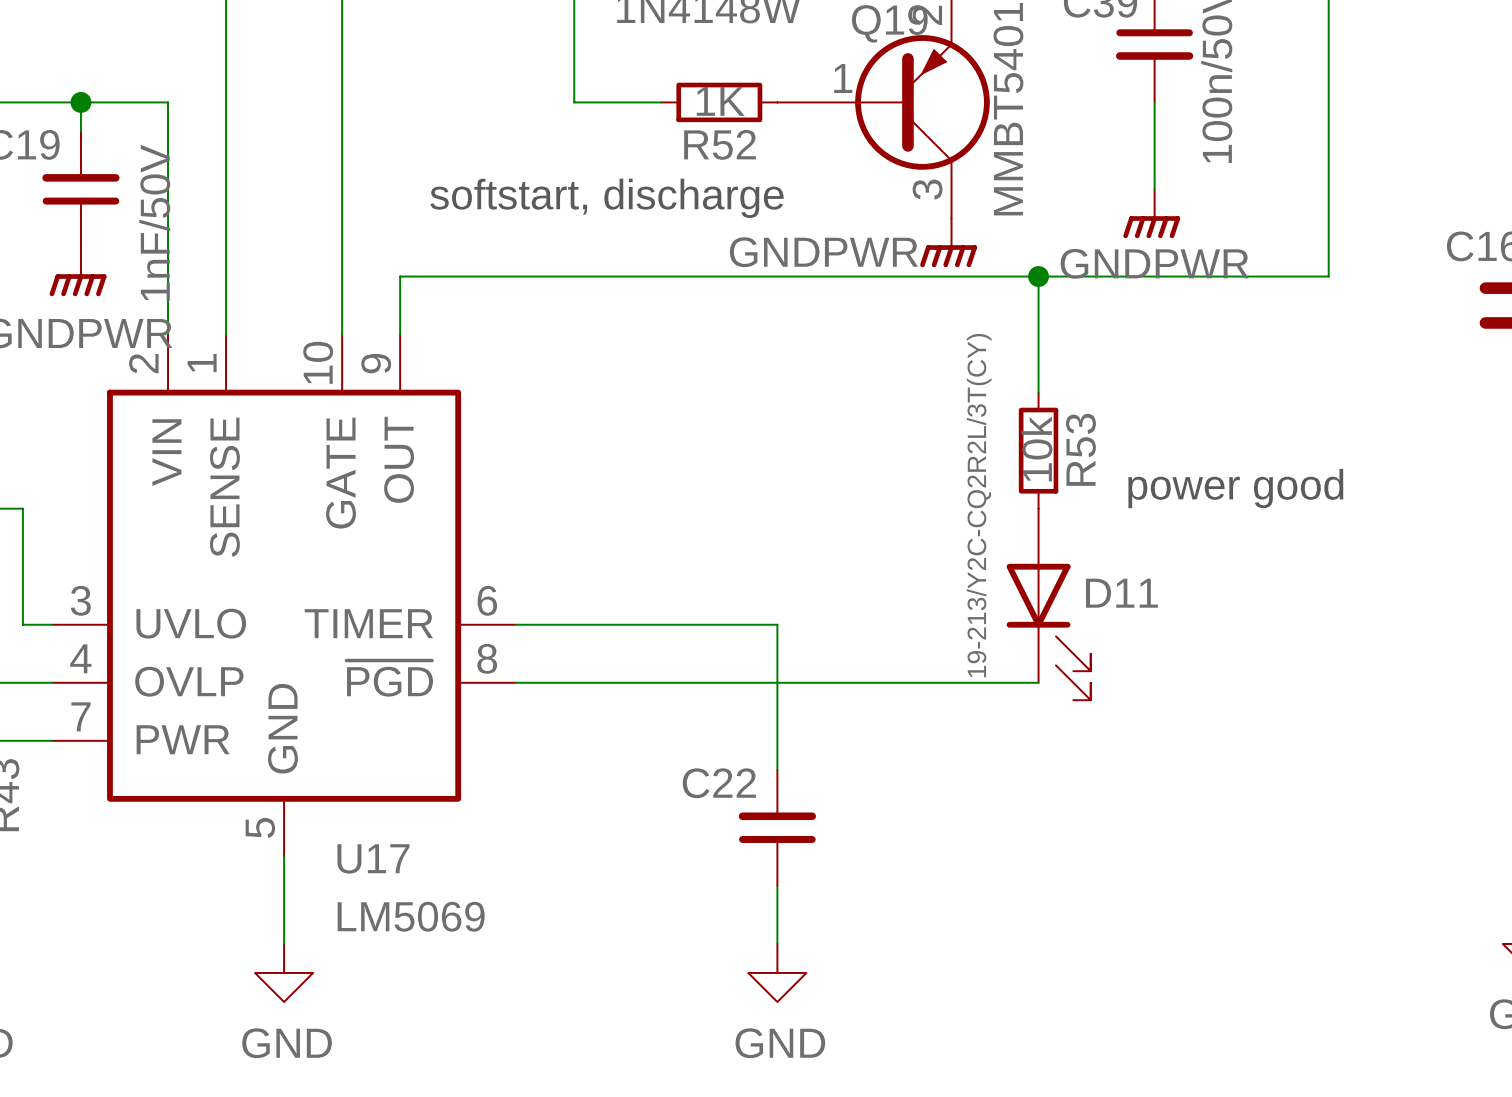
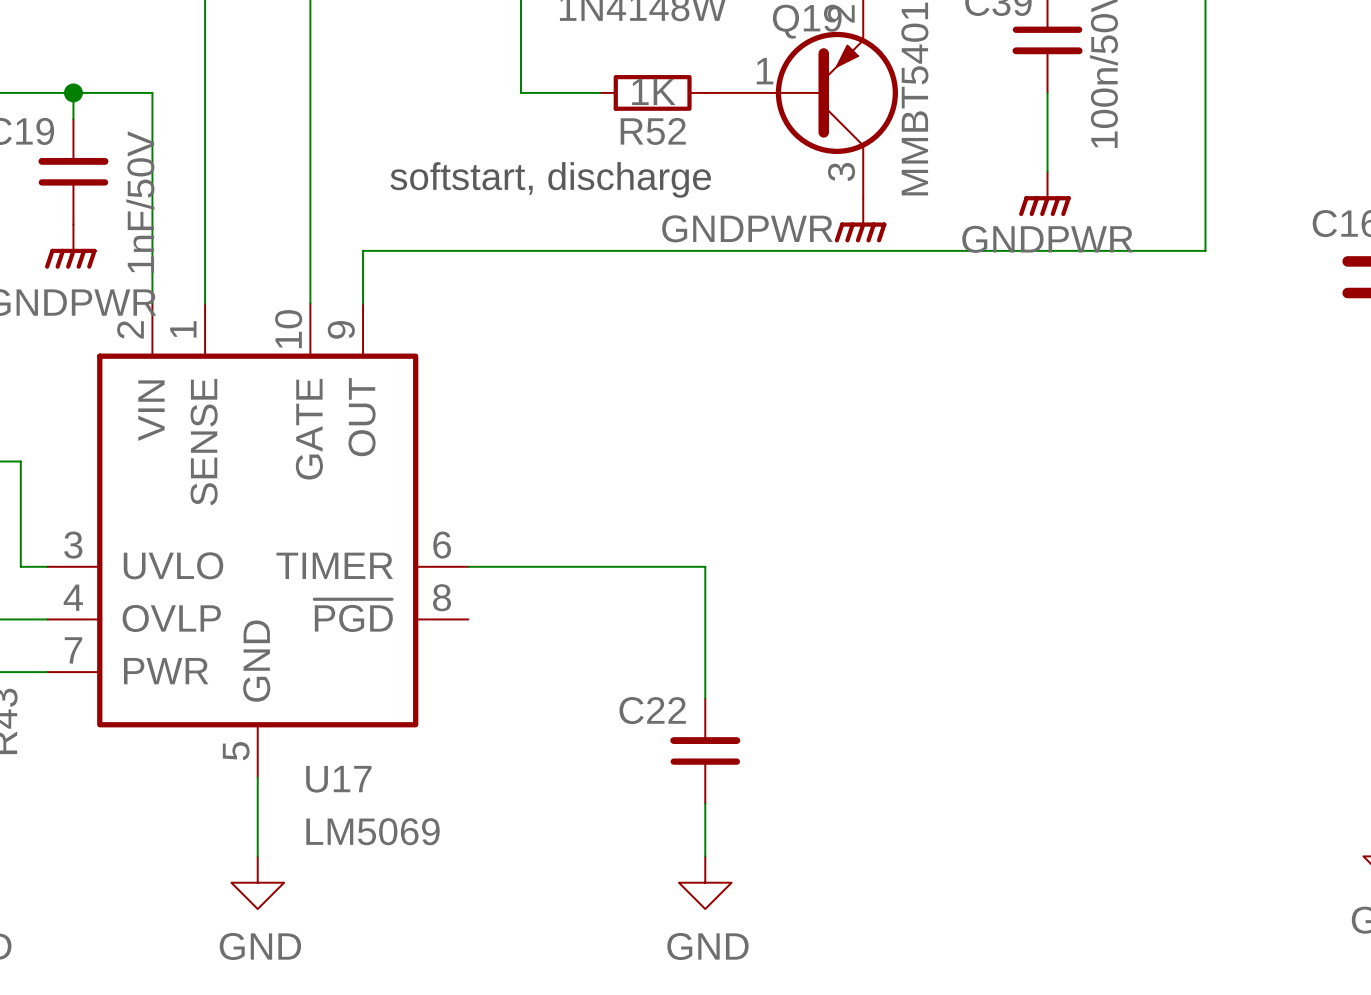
wire: (1038, 276) (1038, 392) -> none
junction: (1038, 276) -> none
R53: 10k (1038, 450) -> none
text: power good (1235, 488) -> none
D11: 19-213/Y2C-CQ2R2L/3T(CY) (1048, 604) -> none
wire: (516, 682) (1038, 682) -> none

